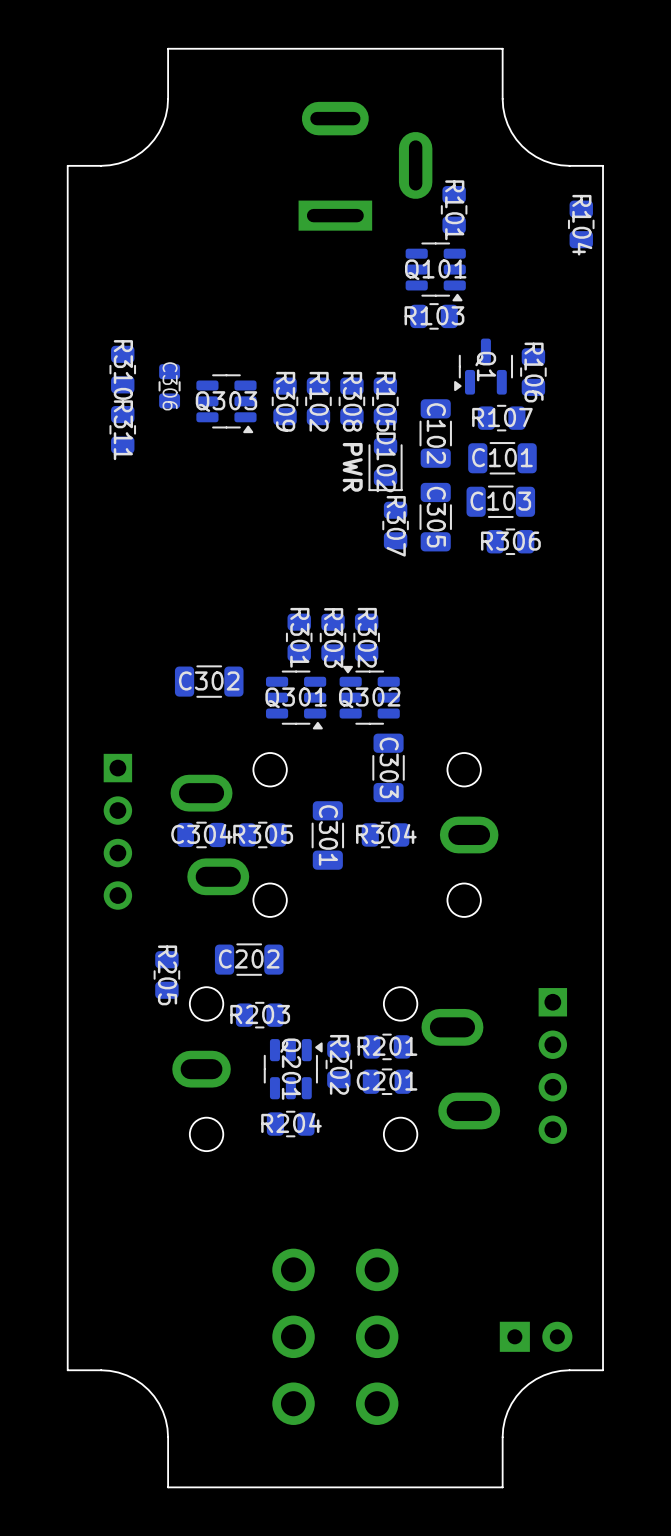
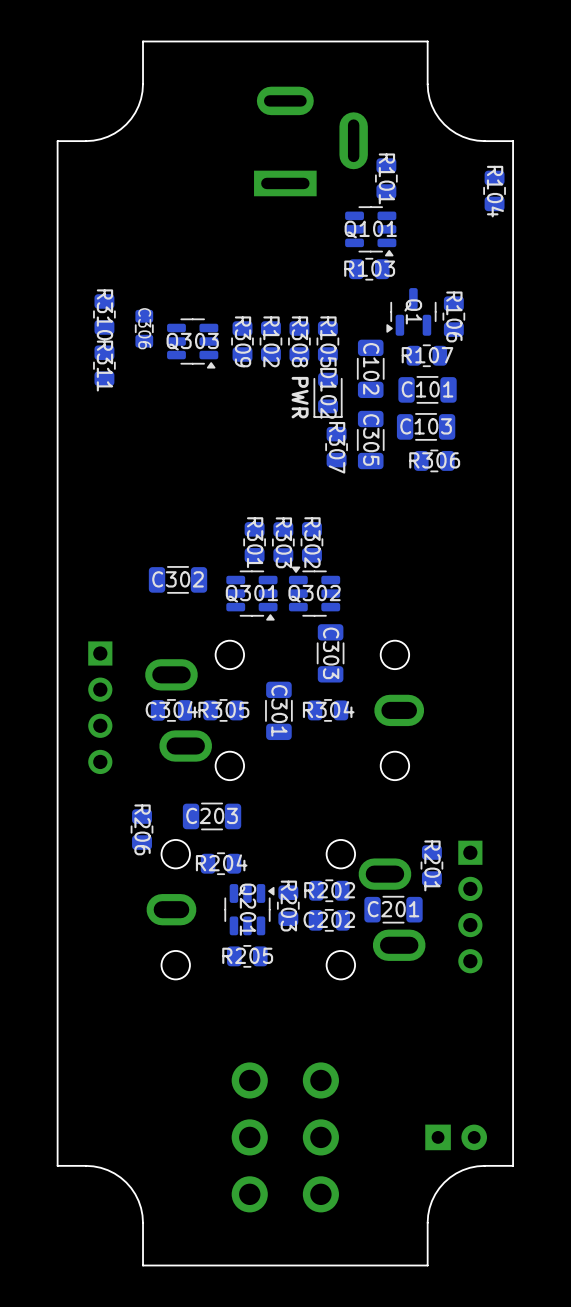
C202 name: C202 (249, 958) -> C203 (212, 815)
R205 name: R205 (167, 975) -> R206 (142, 829)
R203 name: R203 (260, 1014) -> R204 (221, 862)
R201: none -> (431, 865)
R201 name: R201 (387, 1046) -> R202 (329, 890)
R202 name: R202 (339, 1064) -> R203 (288, 906)
C201: none -> (393, 909)
C201 name: C201 (387, 1081) -> C202 (329, 919)
R204 name: R204 (291, 1123) -> R205 (247, 955)

